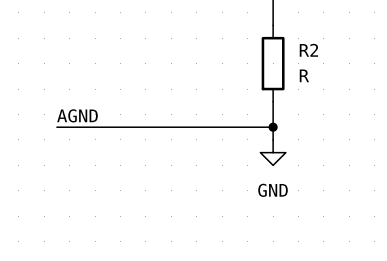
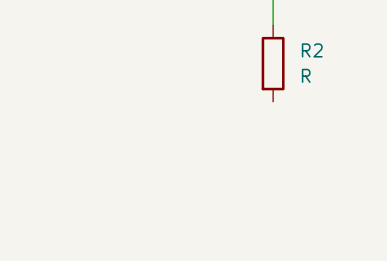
wire: (273, 101) (273, 139) -> none
label: AGND (77, 115) -> none
wire: (56, 127) (273, 127) -> none
junction: (273, 127) -> none
power symbol: GND (273, 152) -> none

